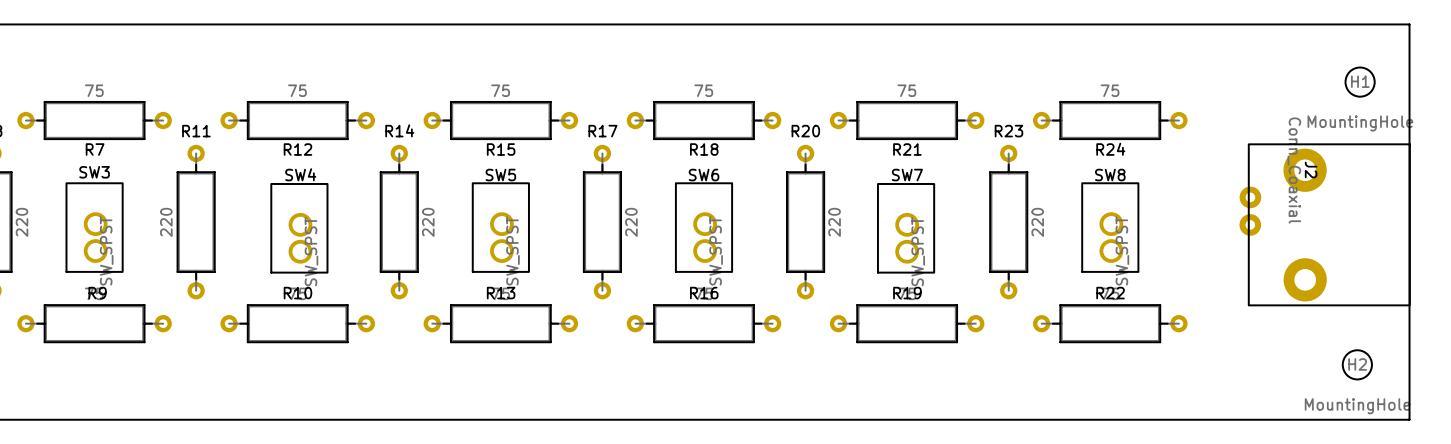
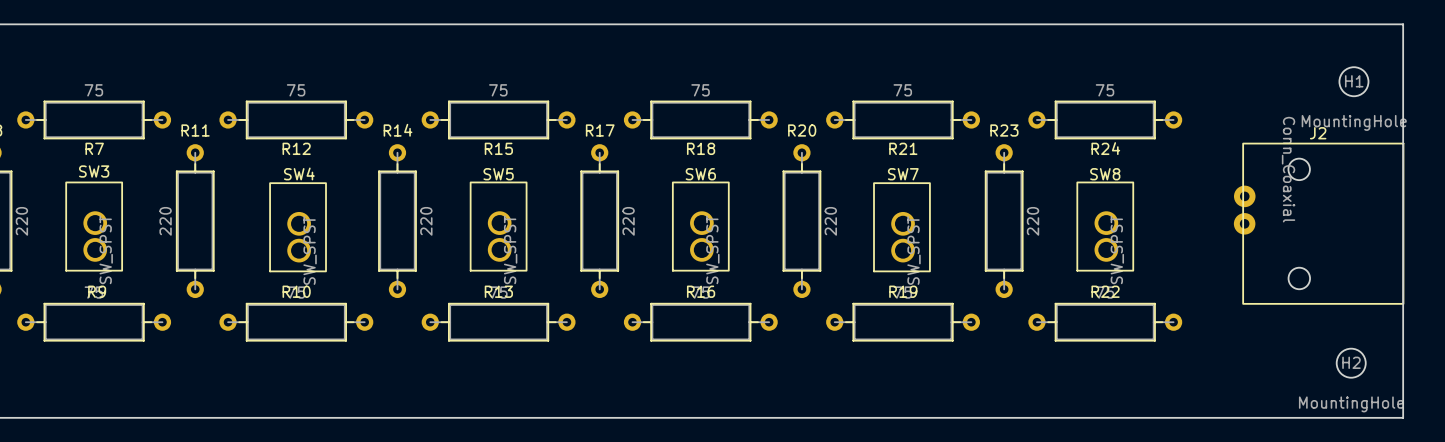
J2 footprint: [1239, 143, 1411, 306] -> [1233, 143, 1404, 305]
J2 name position: J2 (1311, 170) -> J2 (1318, 133)

